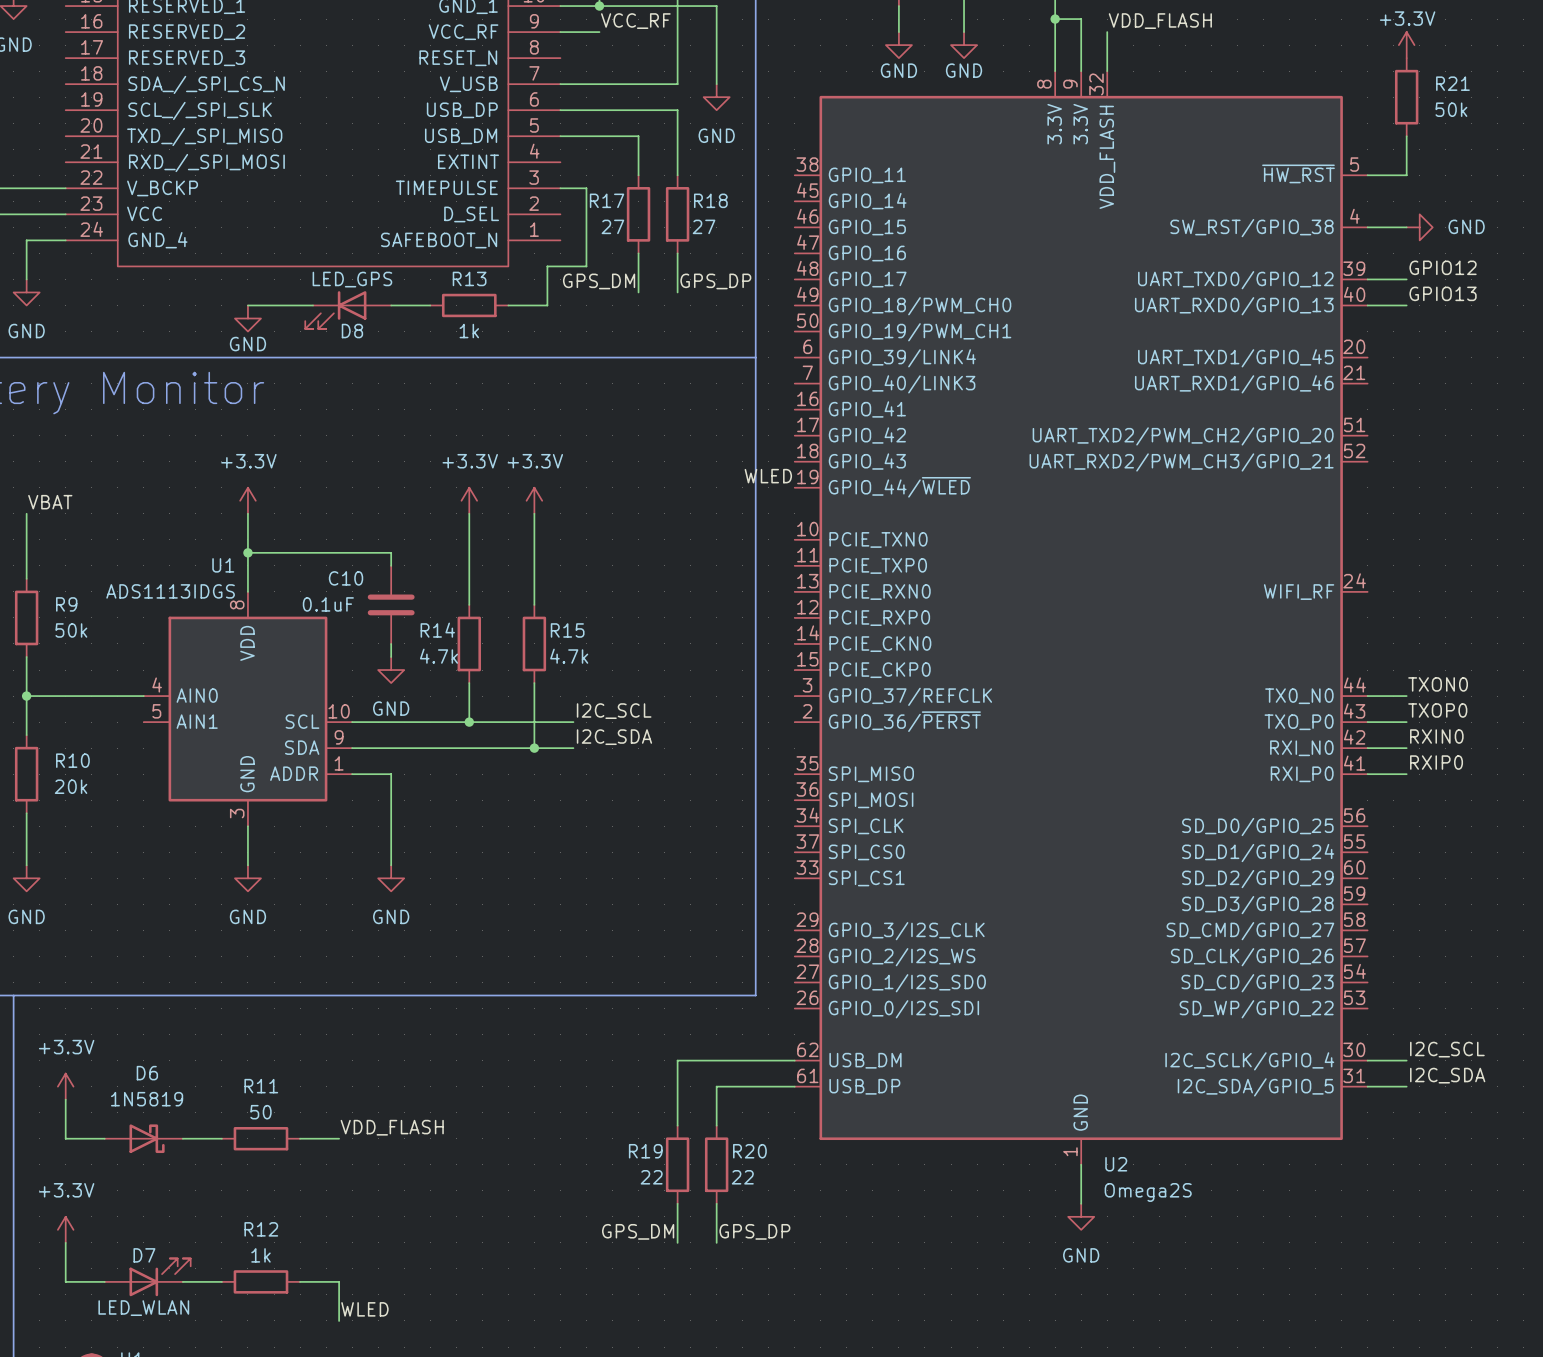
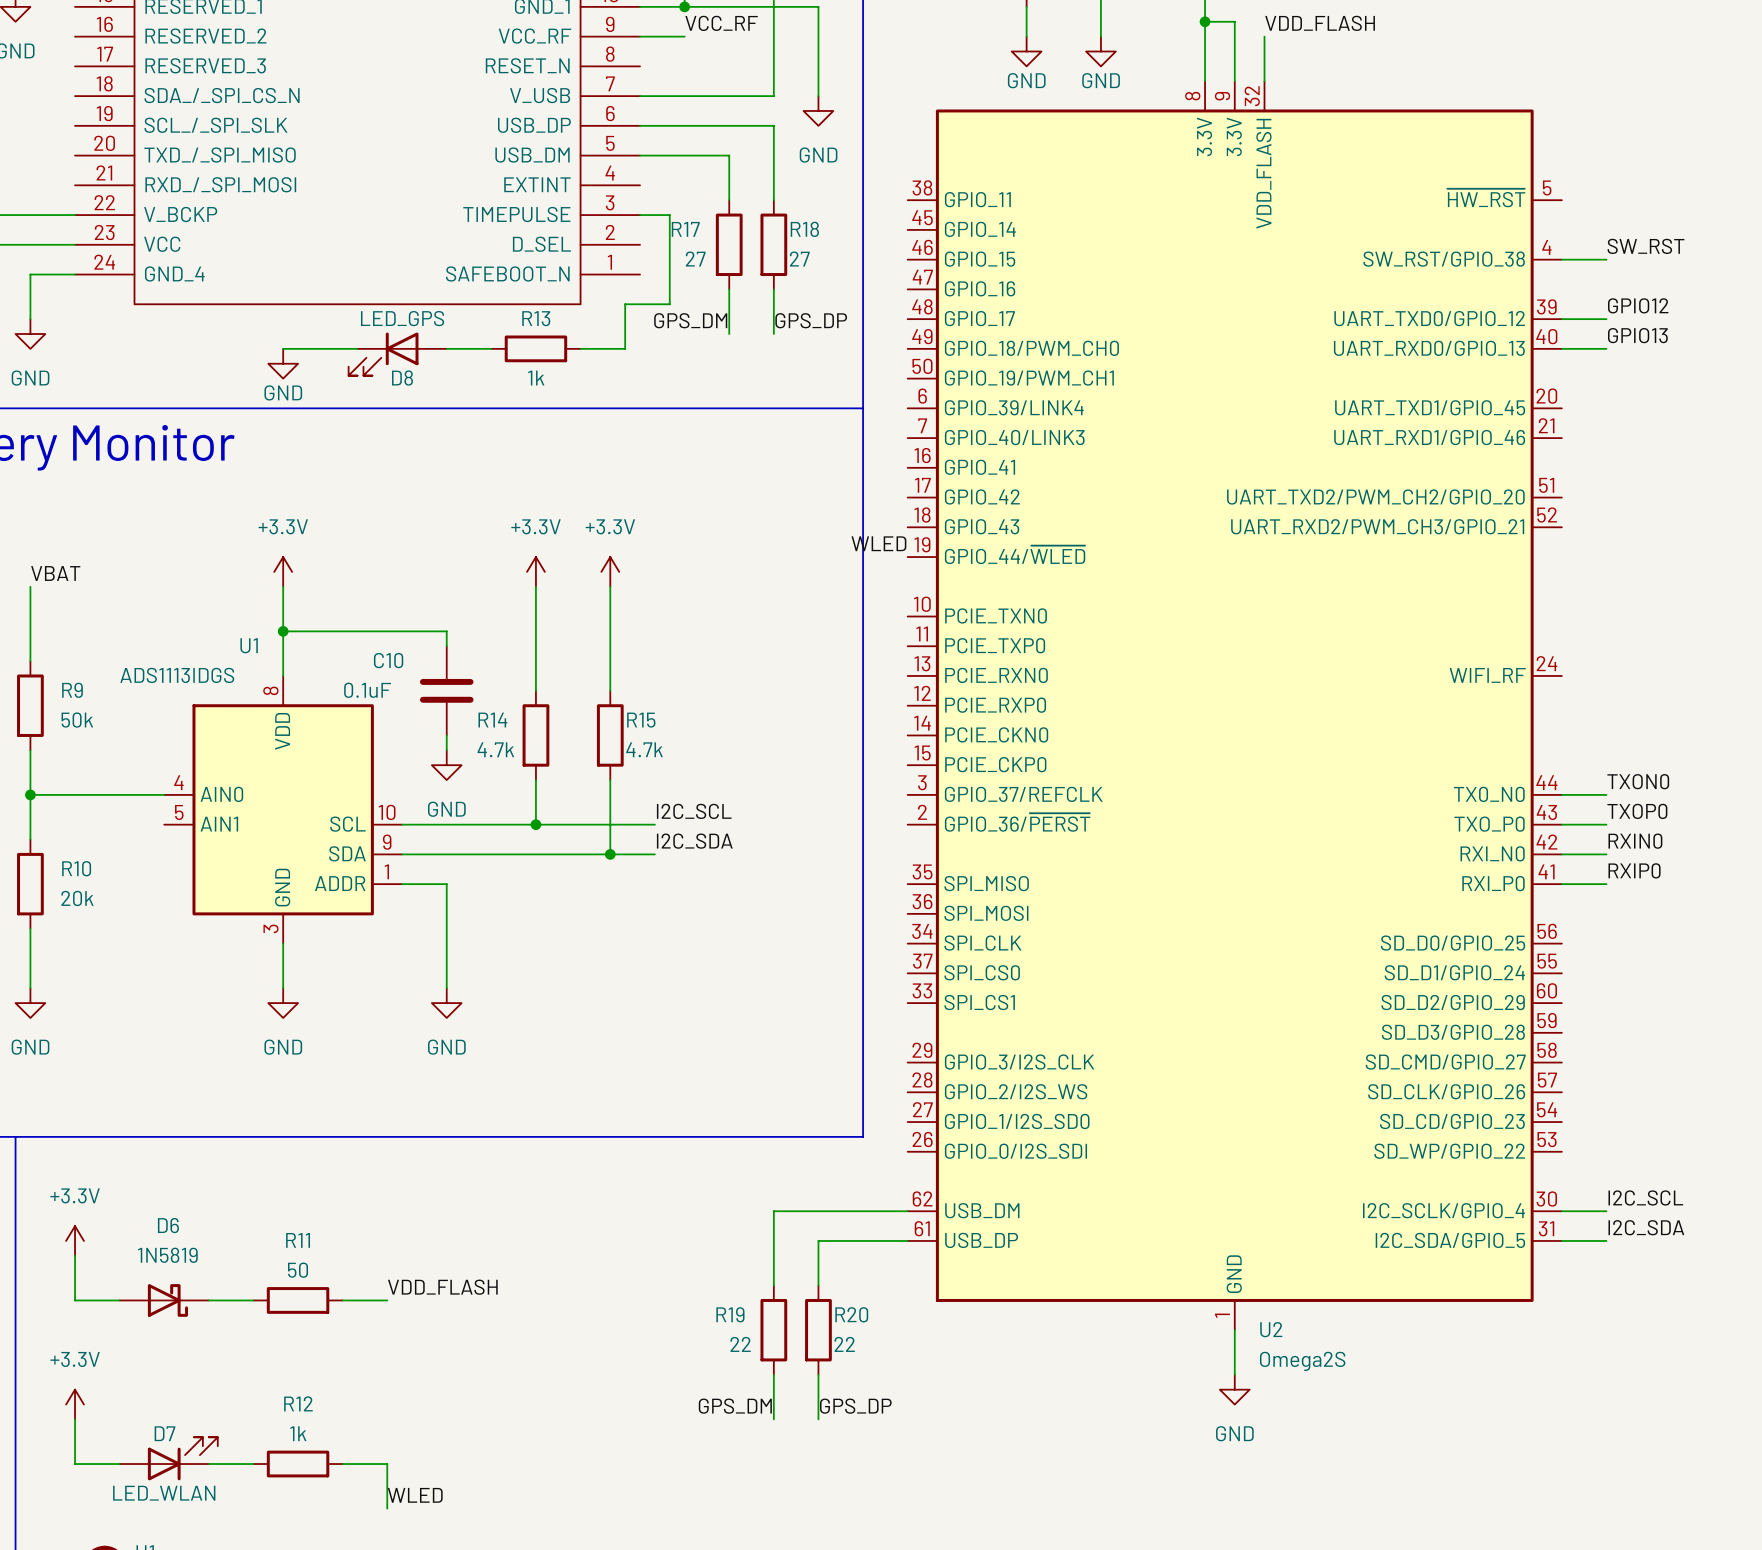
power symbol: +3.3V (1406, 45) -> none
R21: 50k (1406, 97) -> none
wire: (1406, 136) (1406, 175) (1367, 175) -> none
label: none -> SW_RST (1645, 246)
power symbol: GND (1419, 227) -> none

